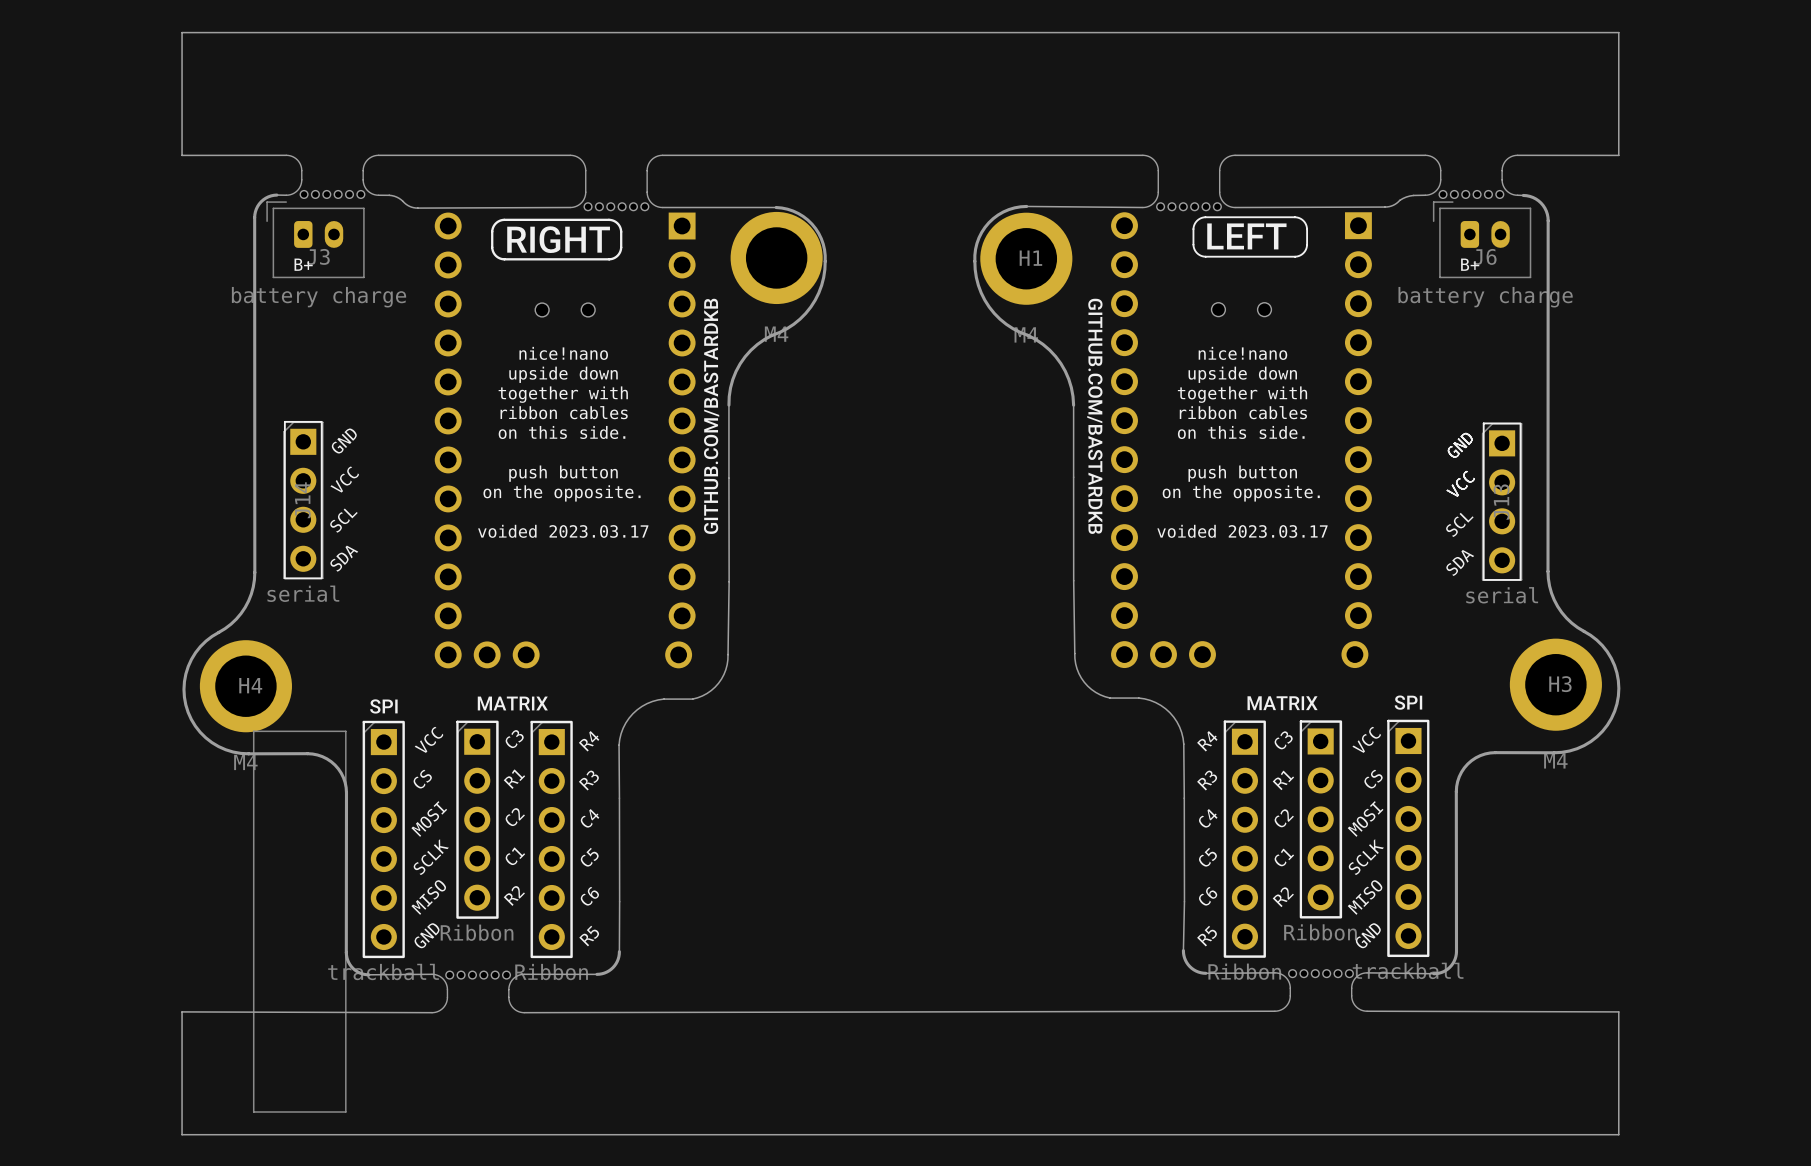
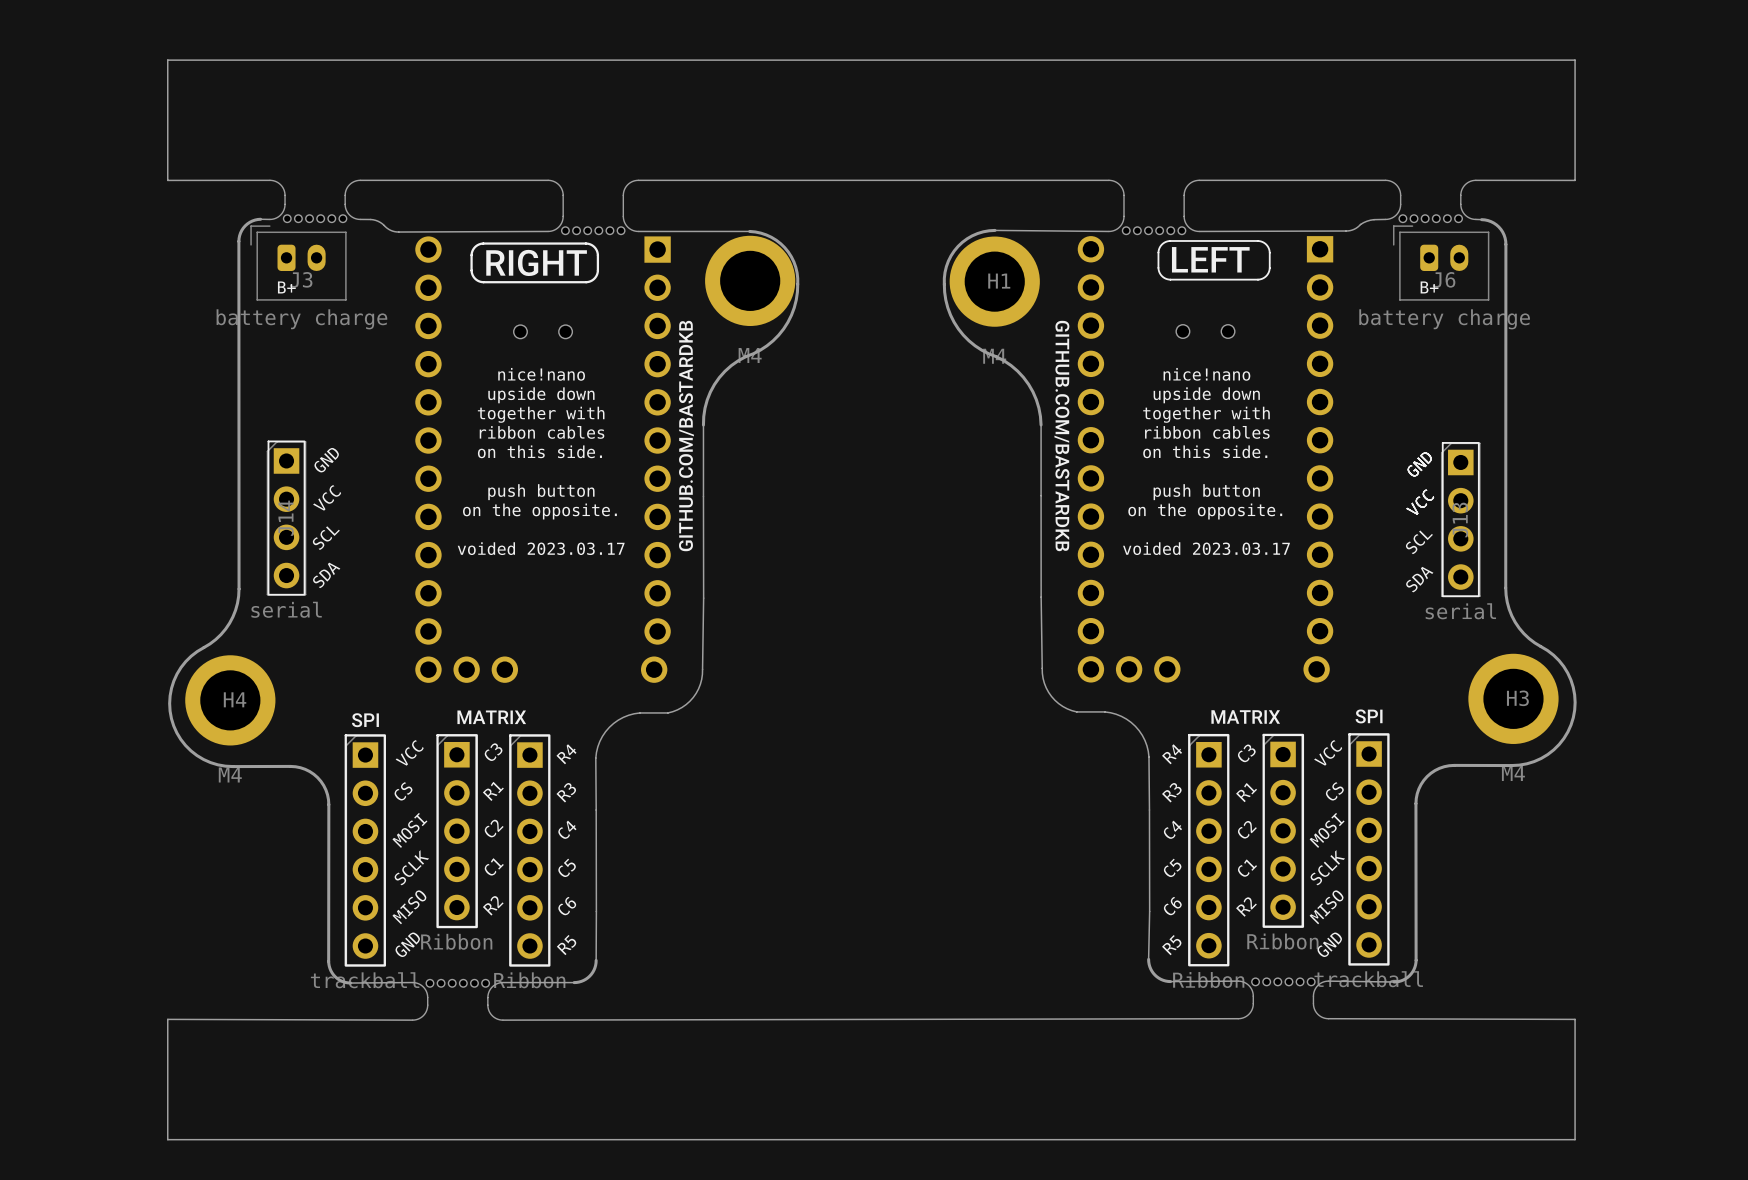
line: (253, 731) (345, 731) (345, 1111) (253, 1111) (253, 731) -> none

